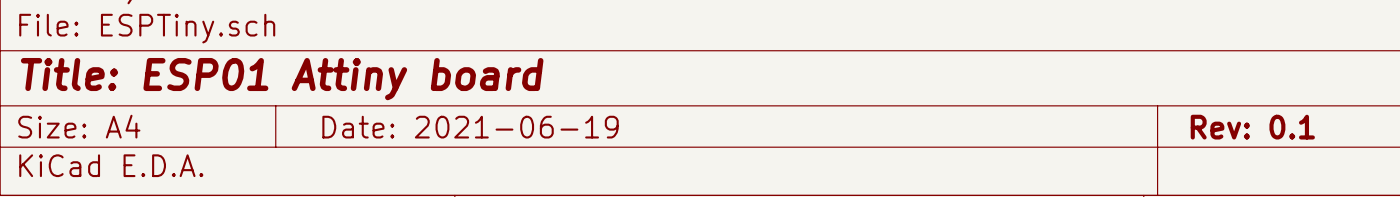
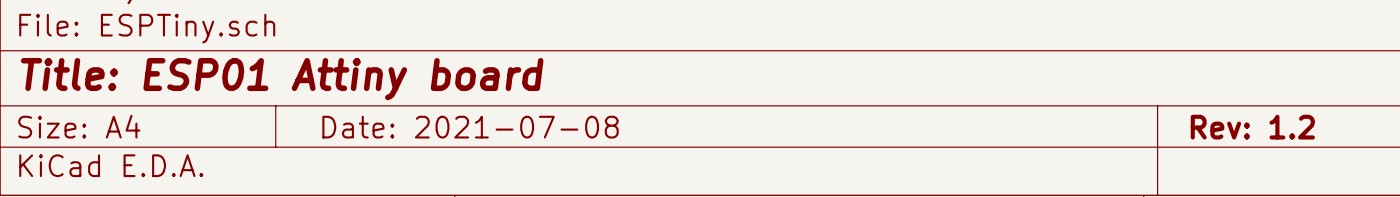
title block: Date: 2021-06-19 (470, 127) -> Date: 2021-07-08 (470, 127)
title block: Rev: 0.1 (1252, 127) -> Rev: 1.2 (1252, 127)

